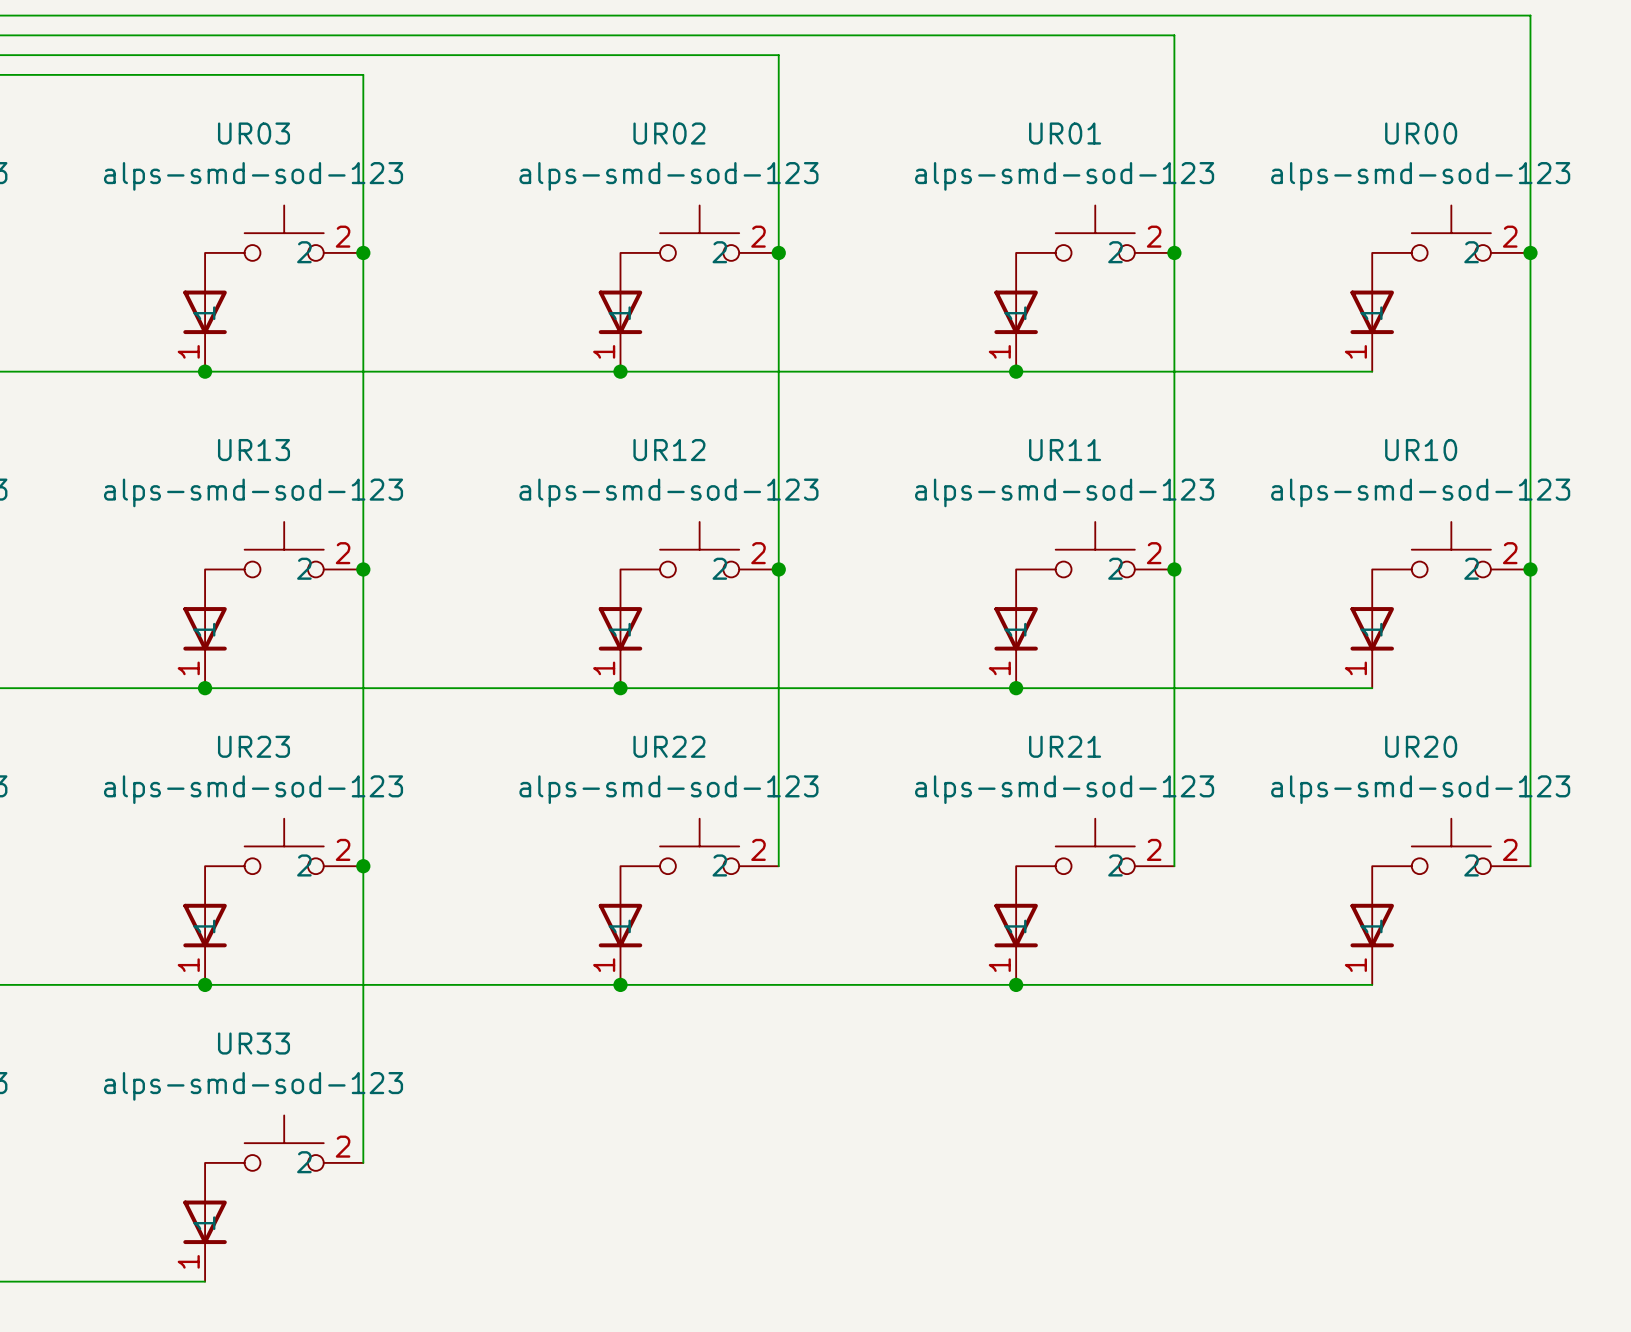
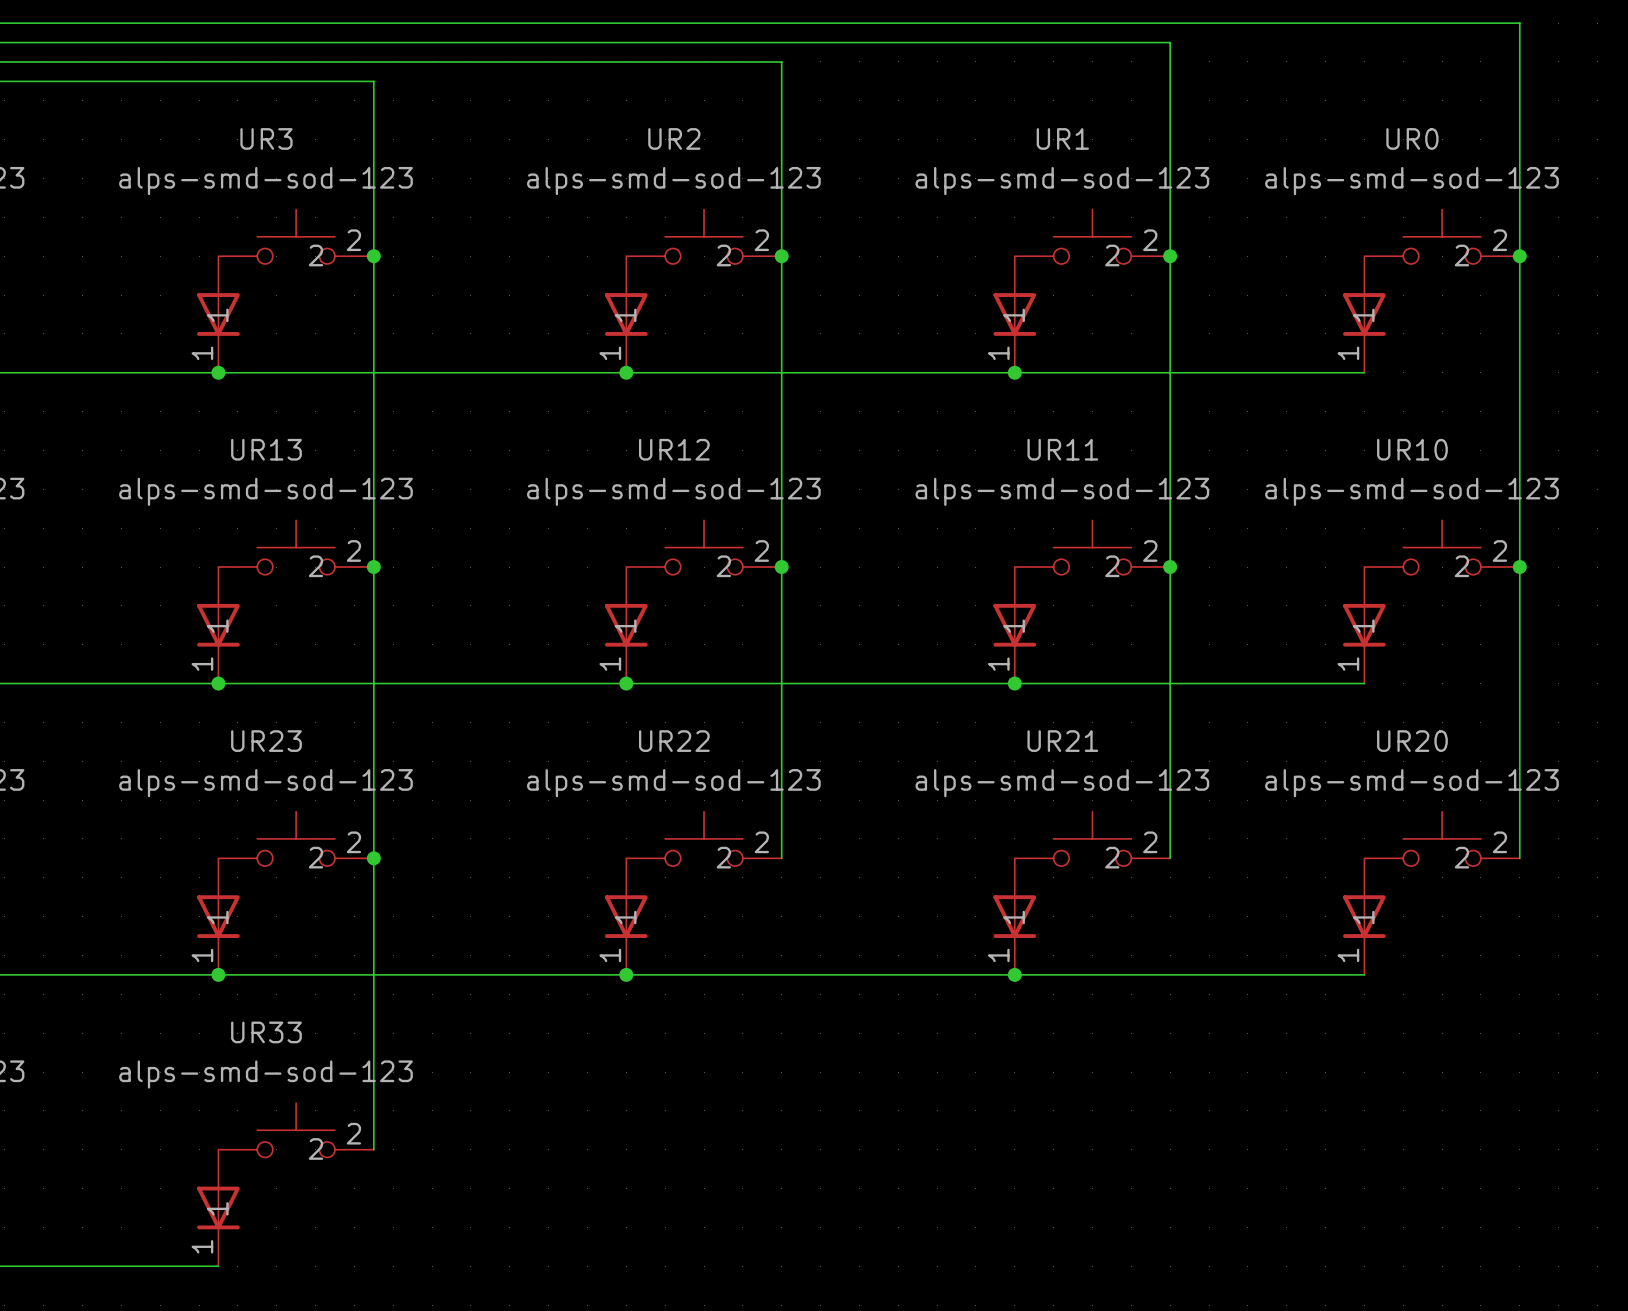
UR03 name: UR03 (254, 133) -> UR3 (266, 138)
UR02 name: UR02 (669, 133) -> UR2 (674, 138)
UR01 name: UR01 (1065, 133) -> UR1 (1062, 138)
UR00 name: UR00 (1421, 133) -> UR0 (1412, 138)

